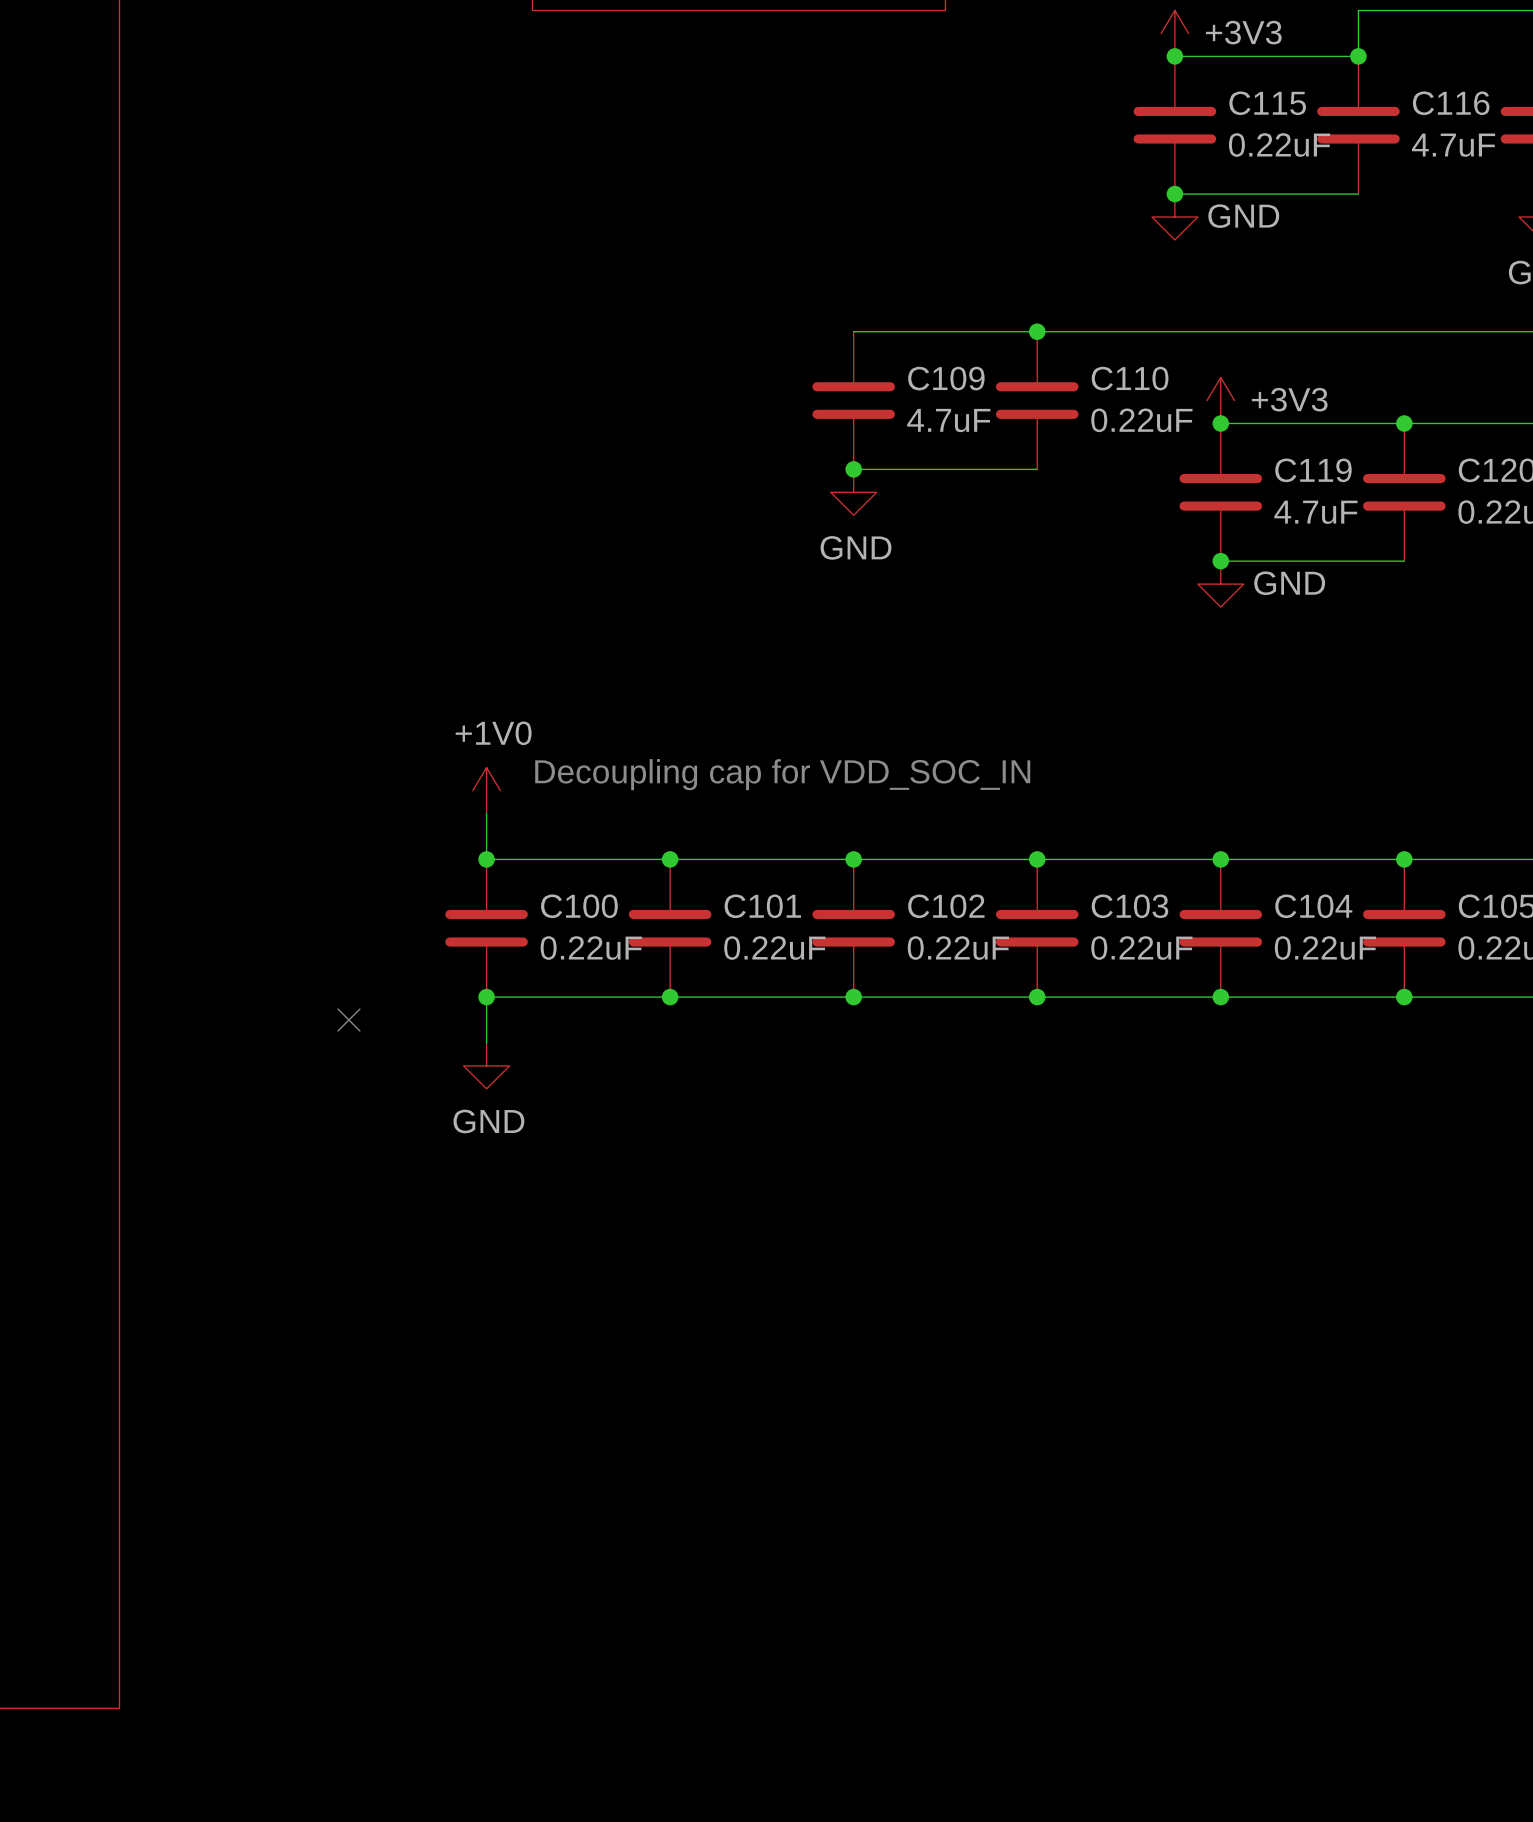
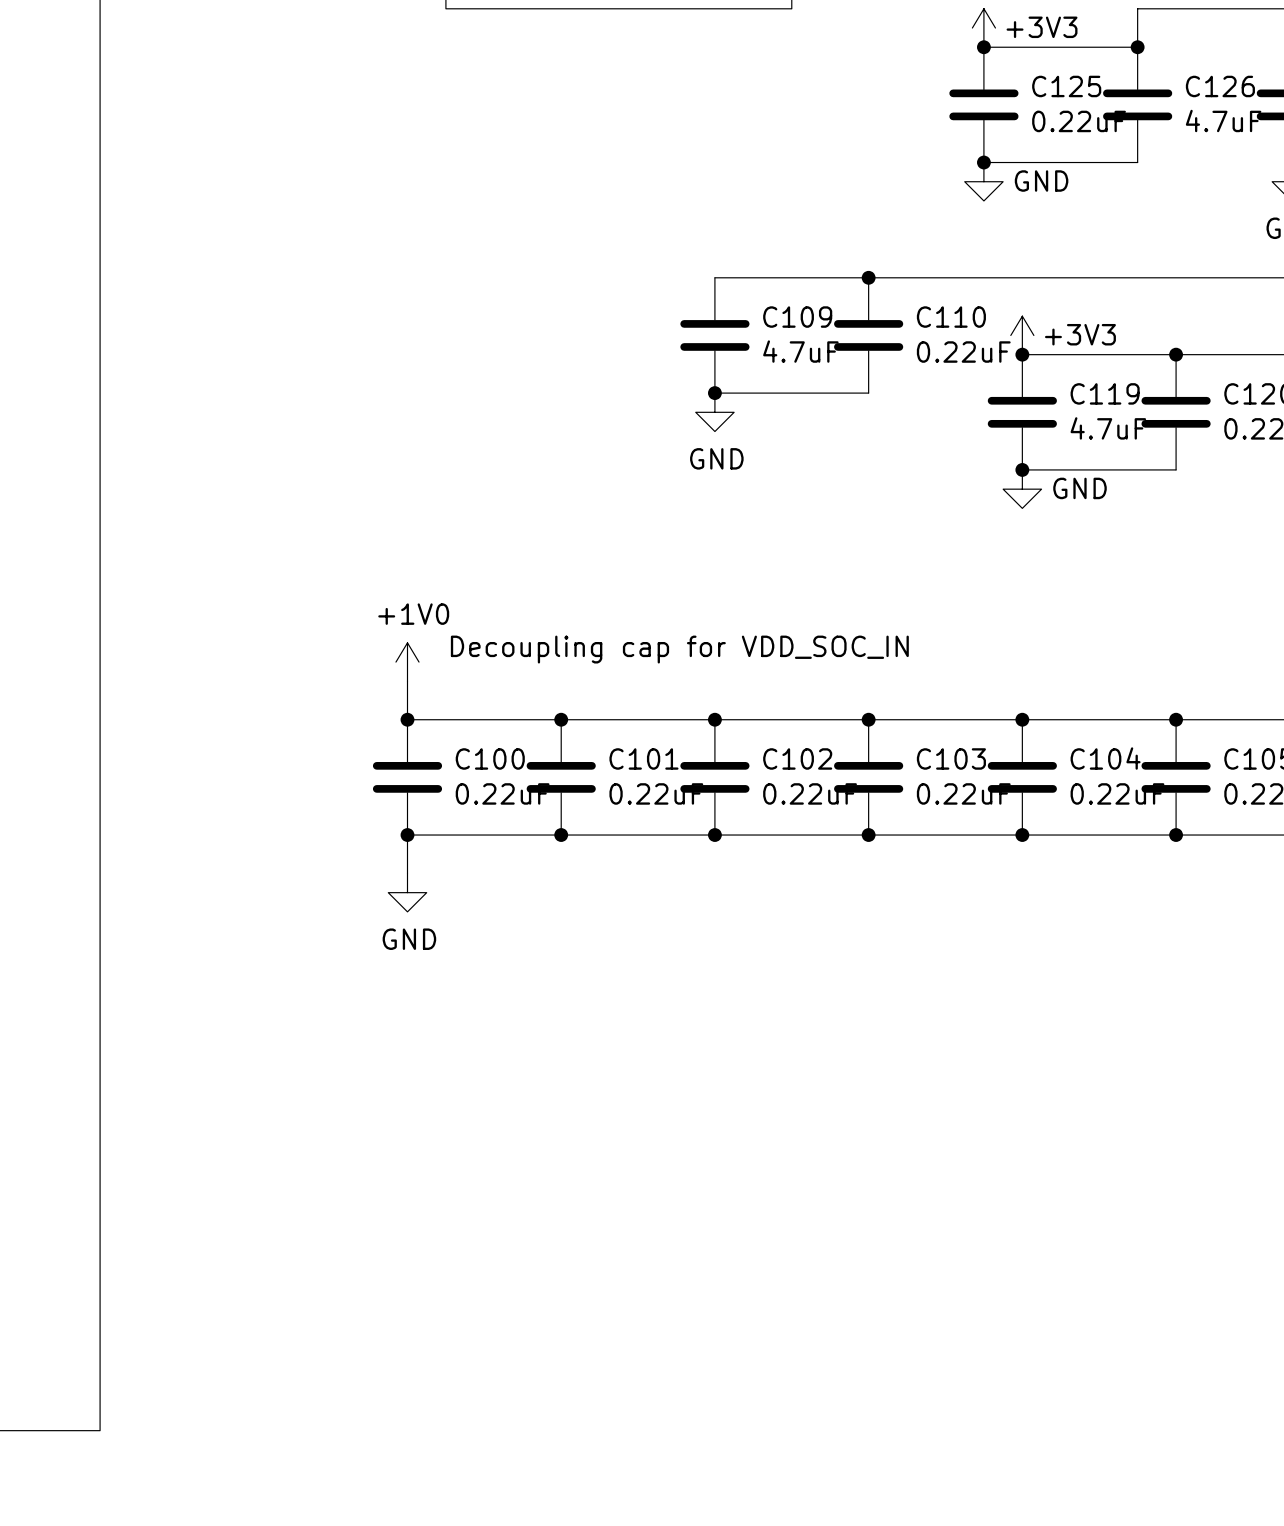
C115 name: C115 (1267, 103) -> C125 (1066, 86)
C116 name: C116 (1451, 103) -> C126 (1220, 86)
no-connect mark: (348, 1020) -> none

